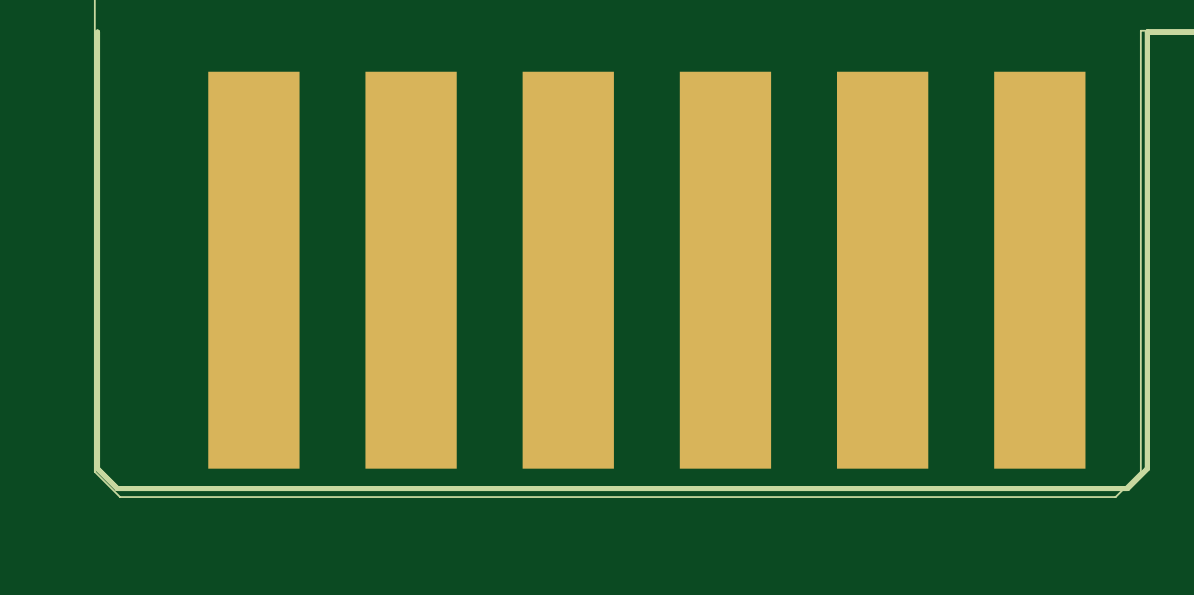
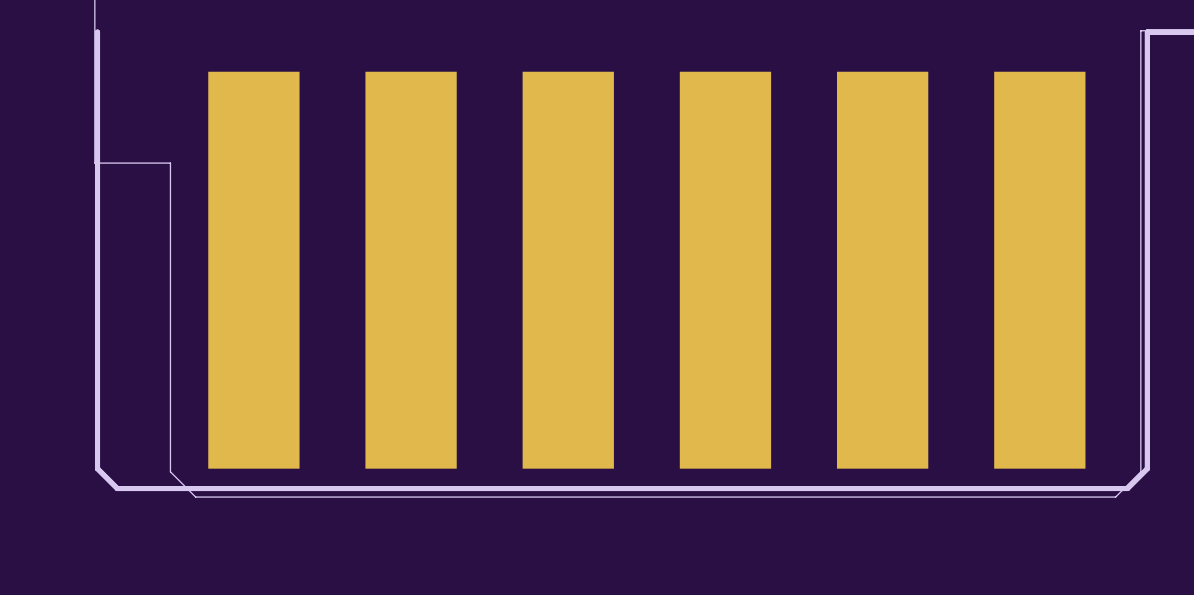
board edge: (94, 163) (94, 471) (120, 497) (195, 497) -> (94, 163) (170, 163) (170, 471) (195, 497)

